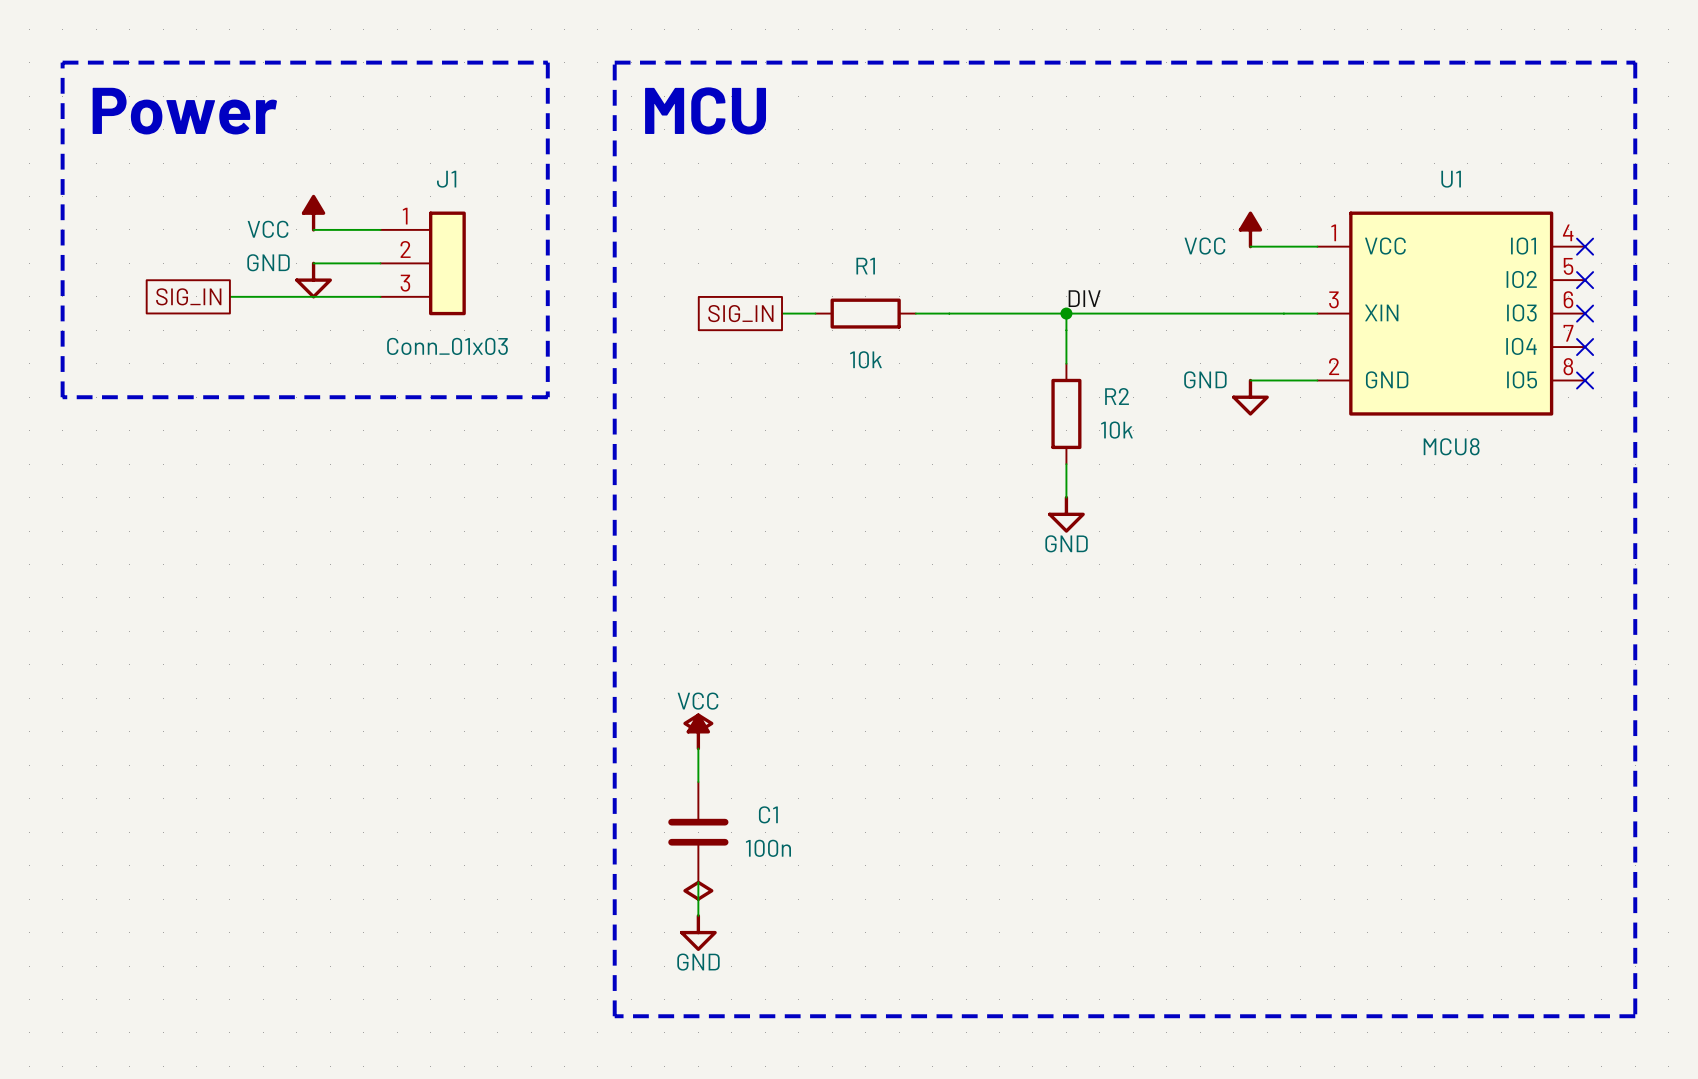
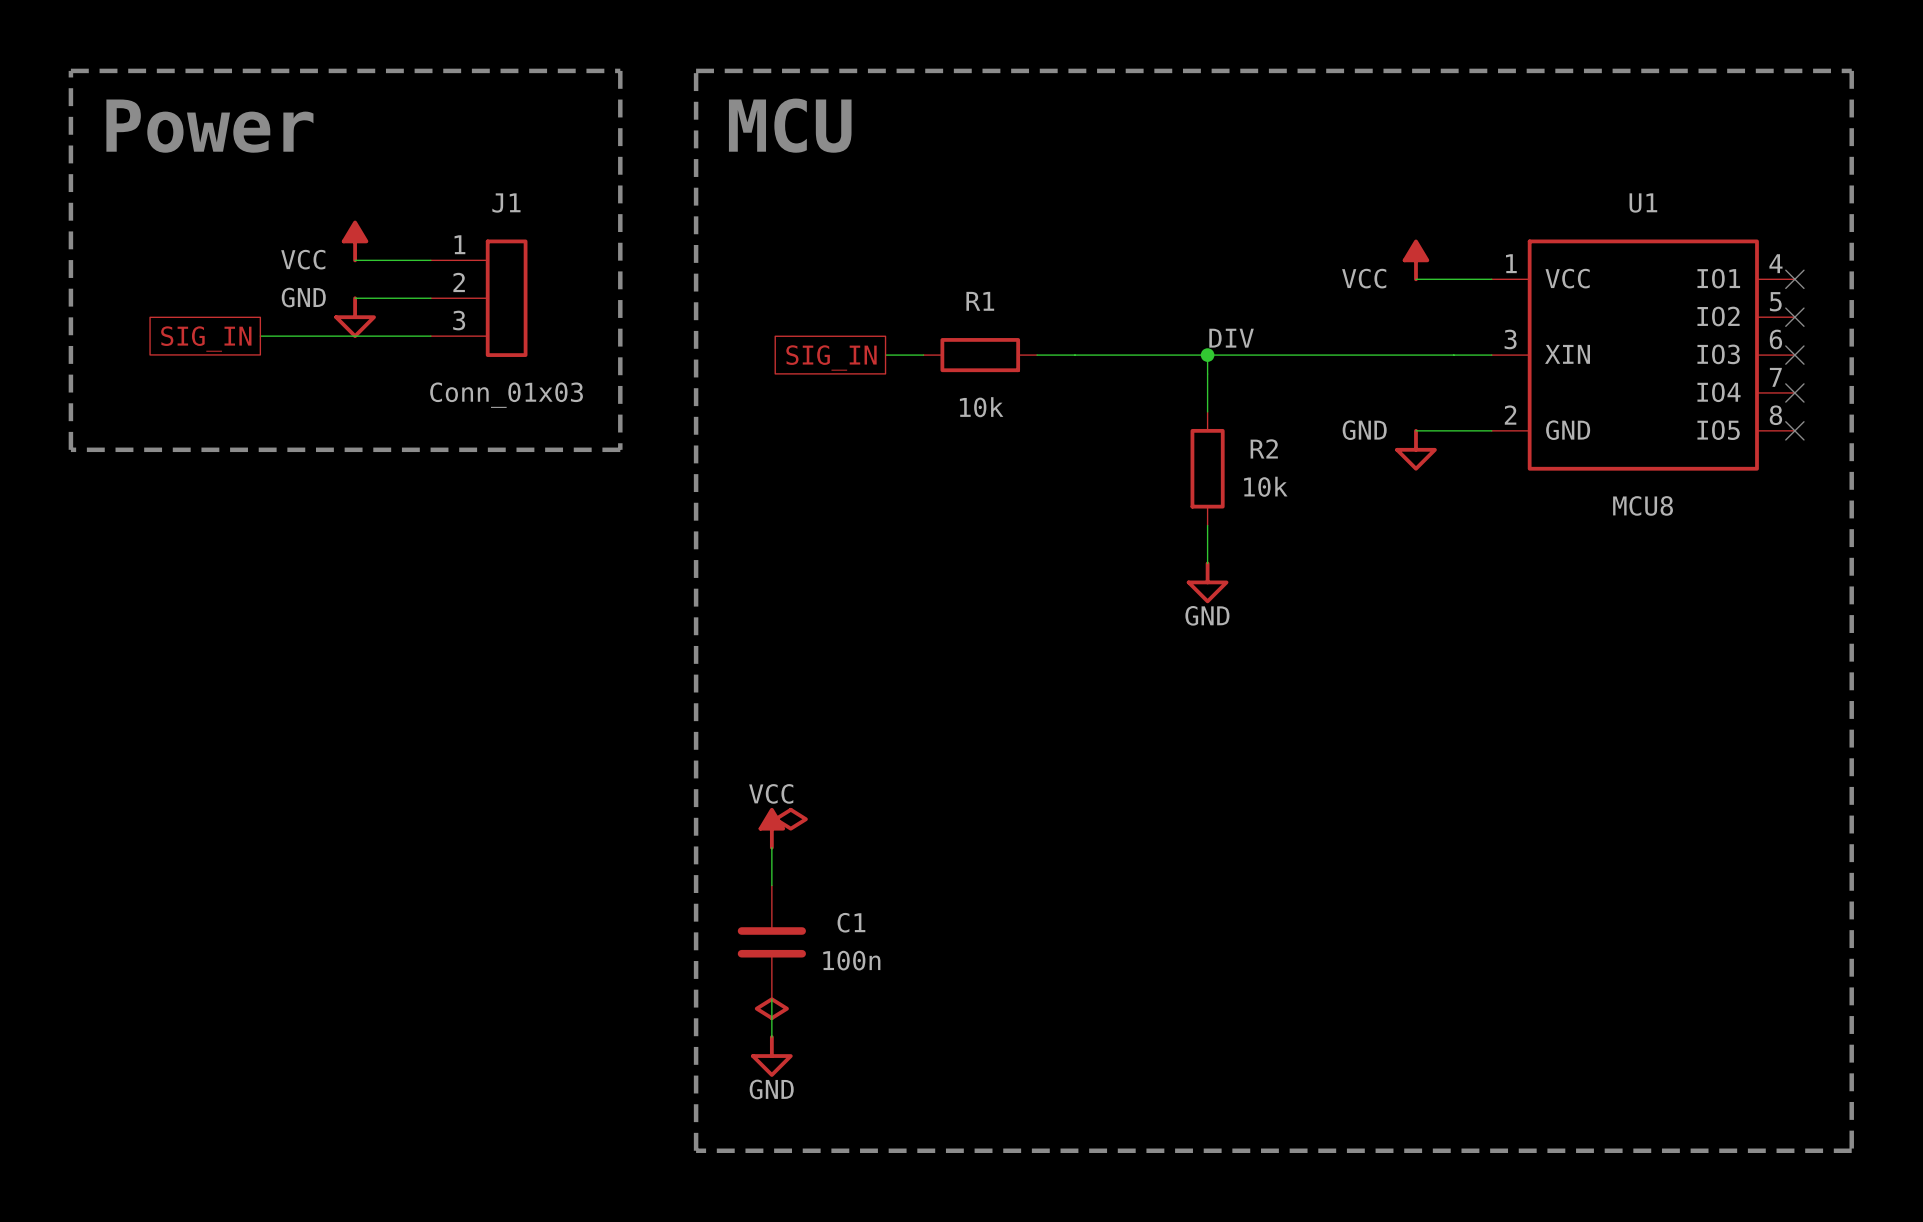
power symbol position: VCC (698, 731) -> VCC (771, 828)
wire: (698, 748) (698, 782) -> (771, 847) (771, 885)
C1 position: (698, 832) -> (771, 942)
wire: (698, 882) (698, 915) -> (771, 999) (771, 1037)
power symbol position: (698, 890) -> (771, 1008)
power symbol position: GND (698, 932) -> GND (771, 1056)

